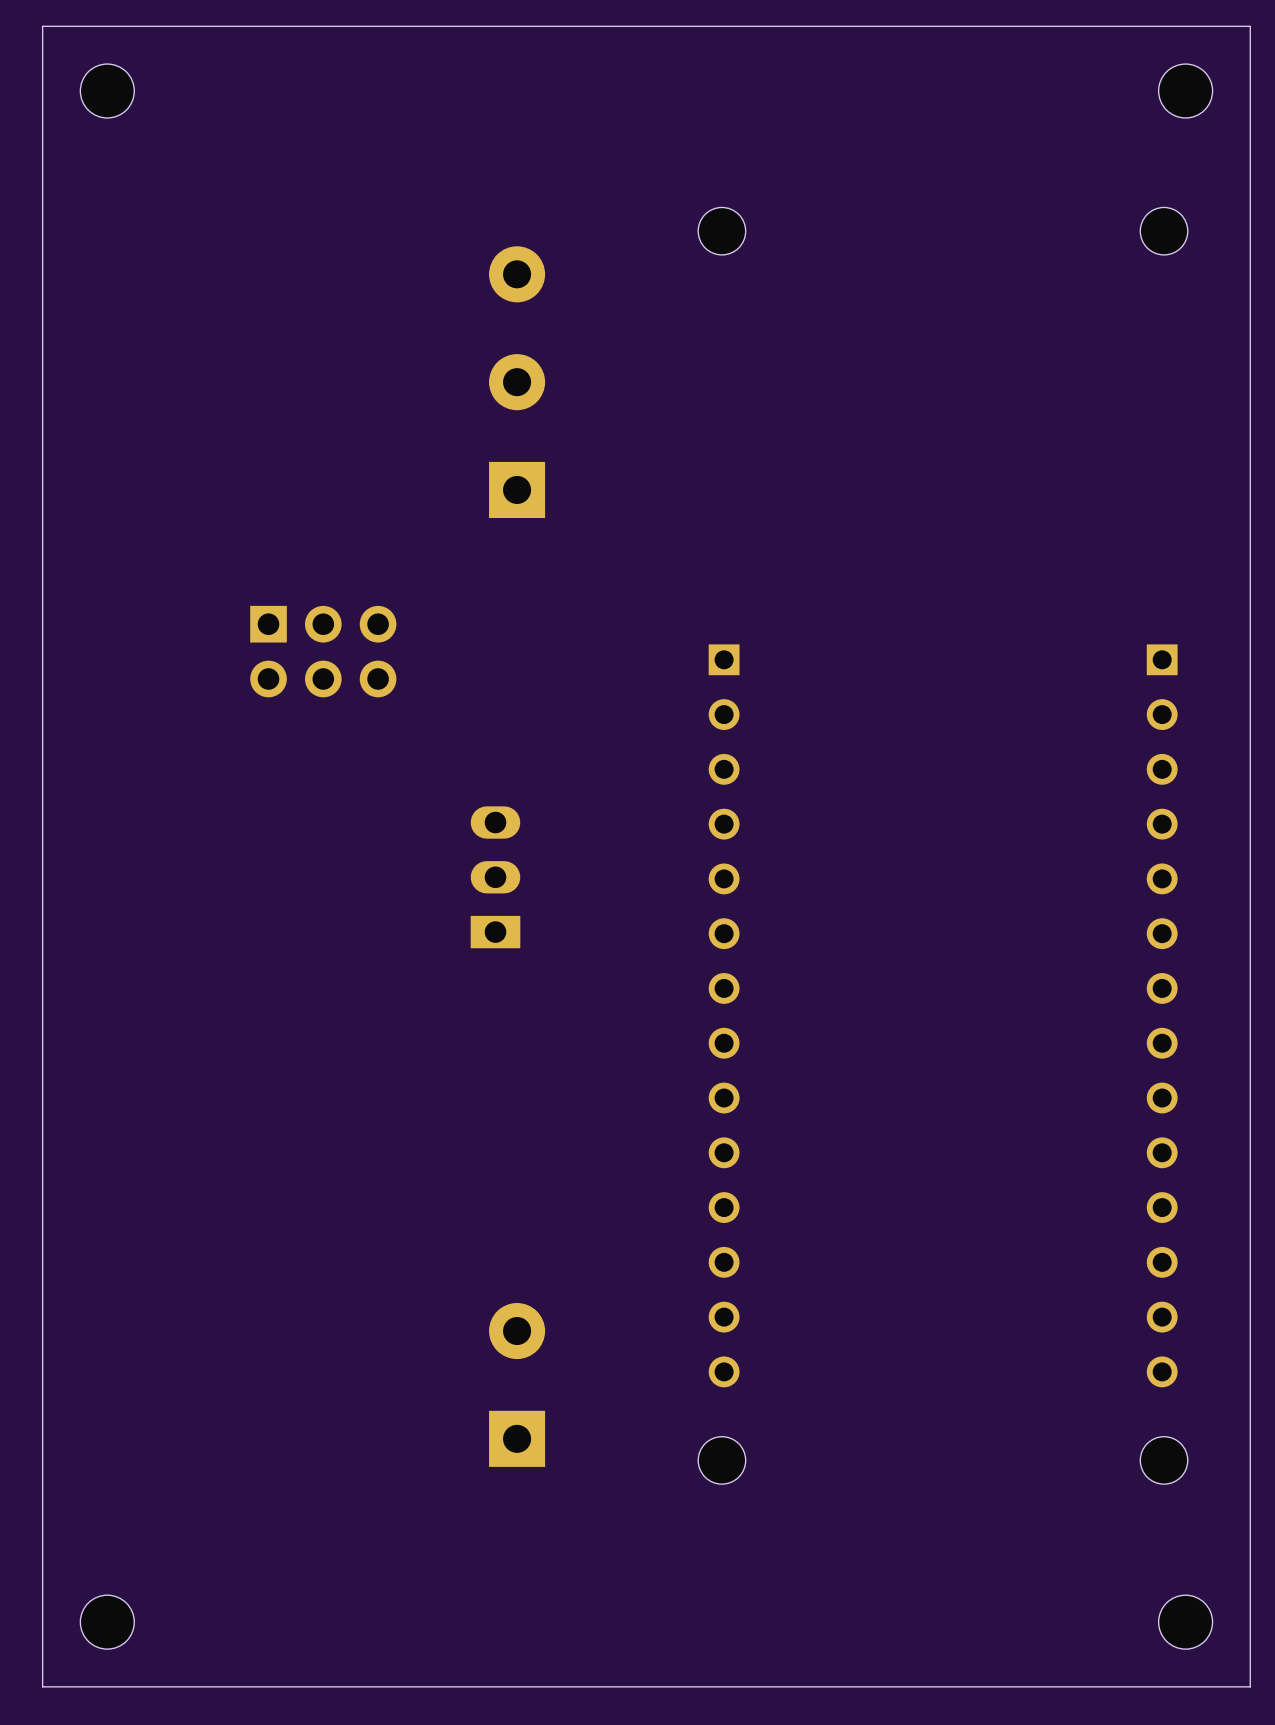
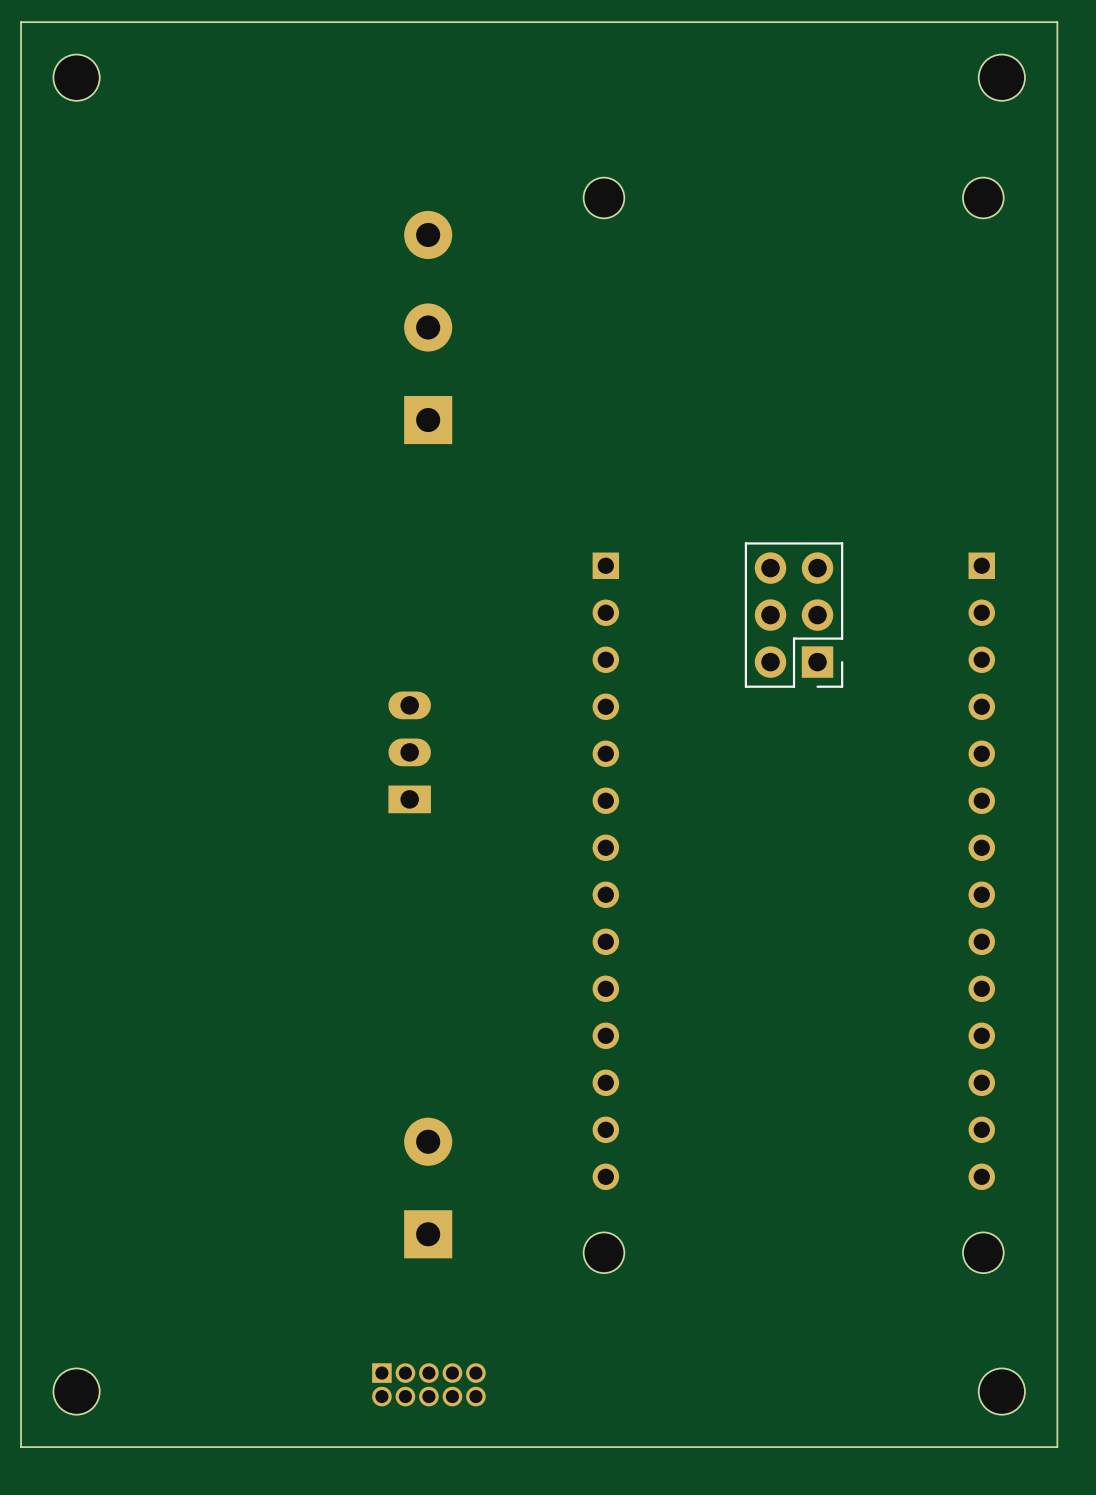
part: (323, 651) -> none
part: none -> (794, 615)
part: none -> (428, 1384)

